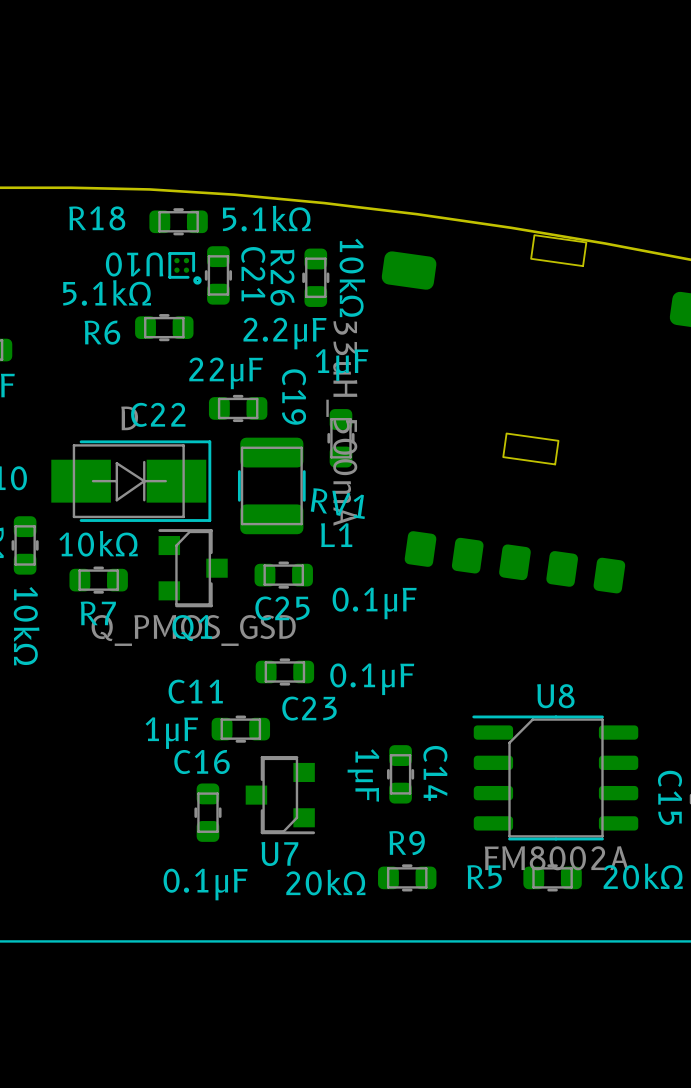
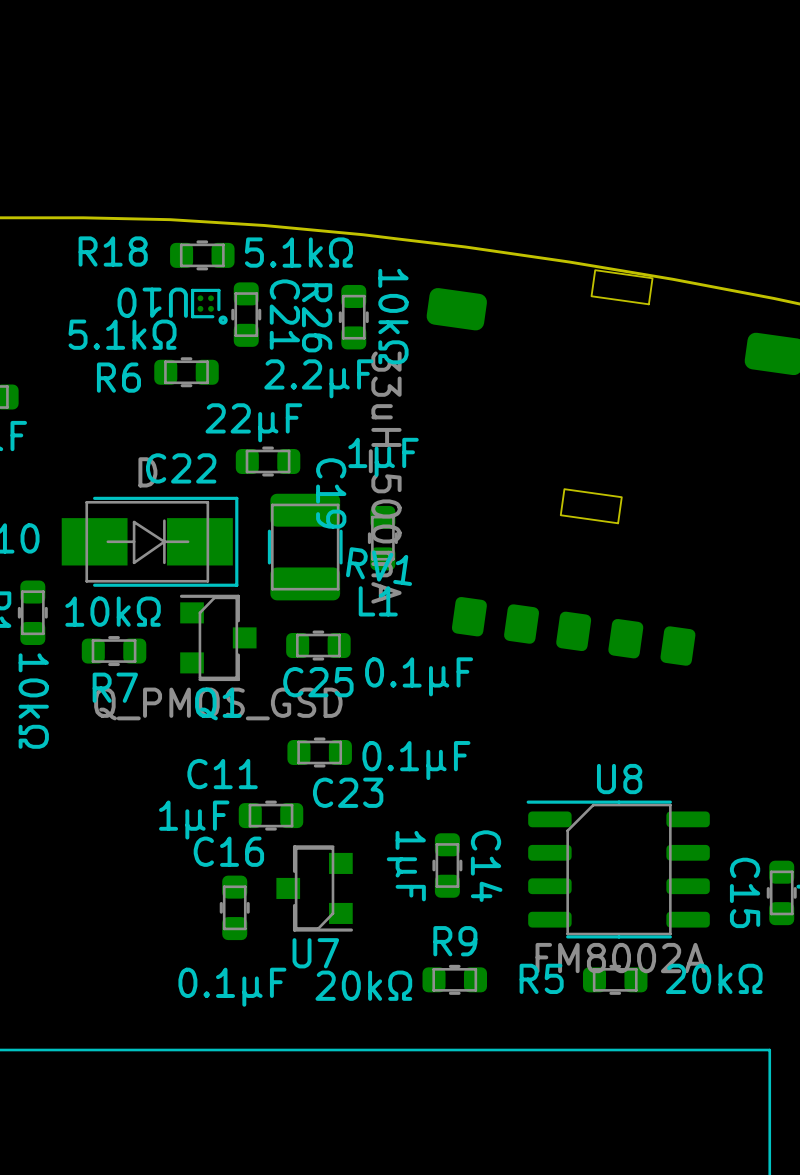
C19 position: (340, 438) -> (382, 538)

